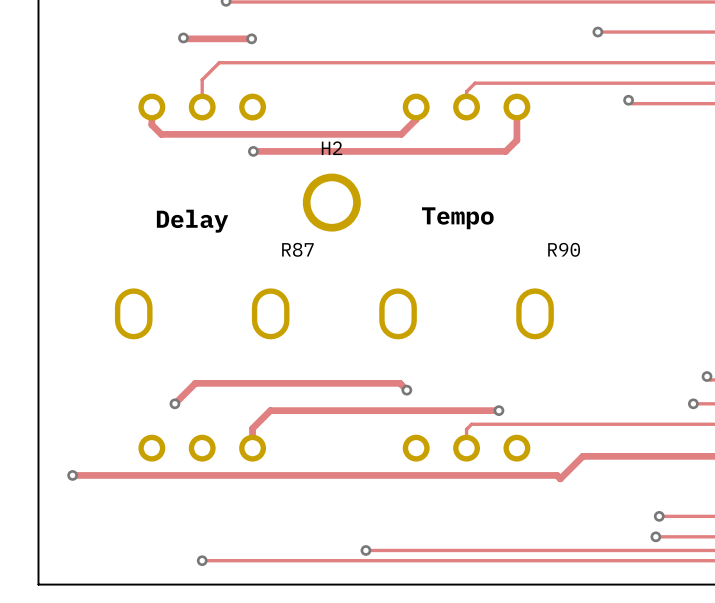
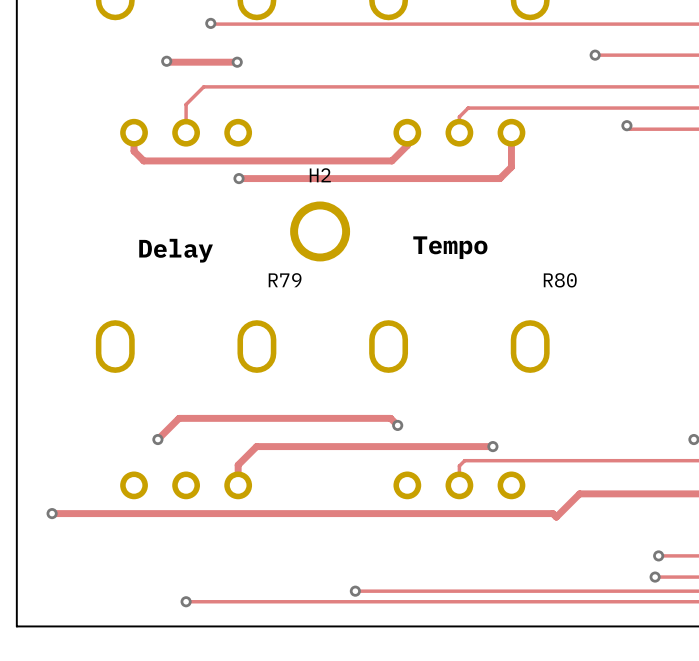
R87 name: R87 (297, 249) -> R79 (285, 280)
R90 name: R90 (564, 249) -> R80 (560, 280)

